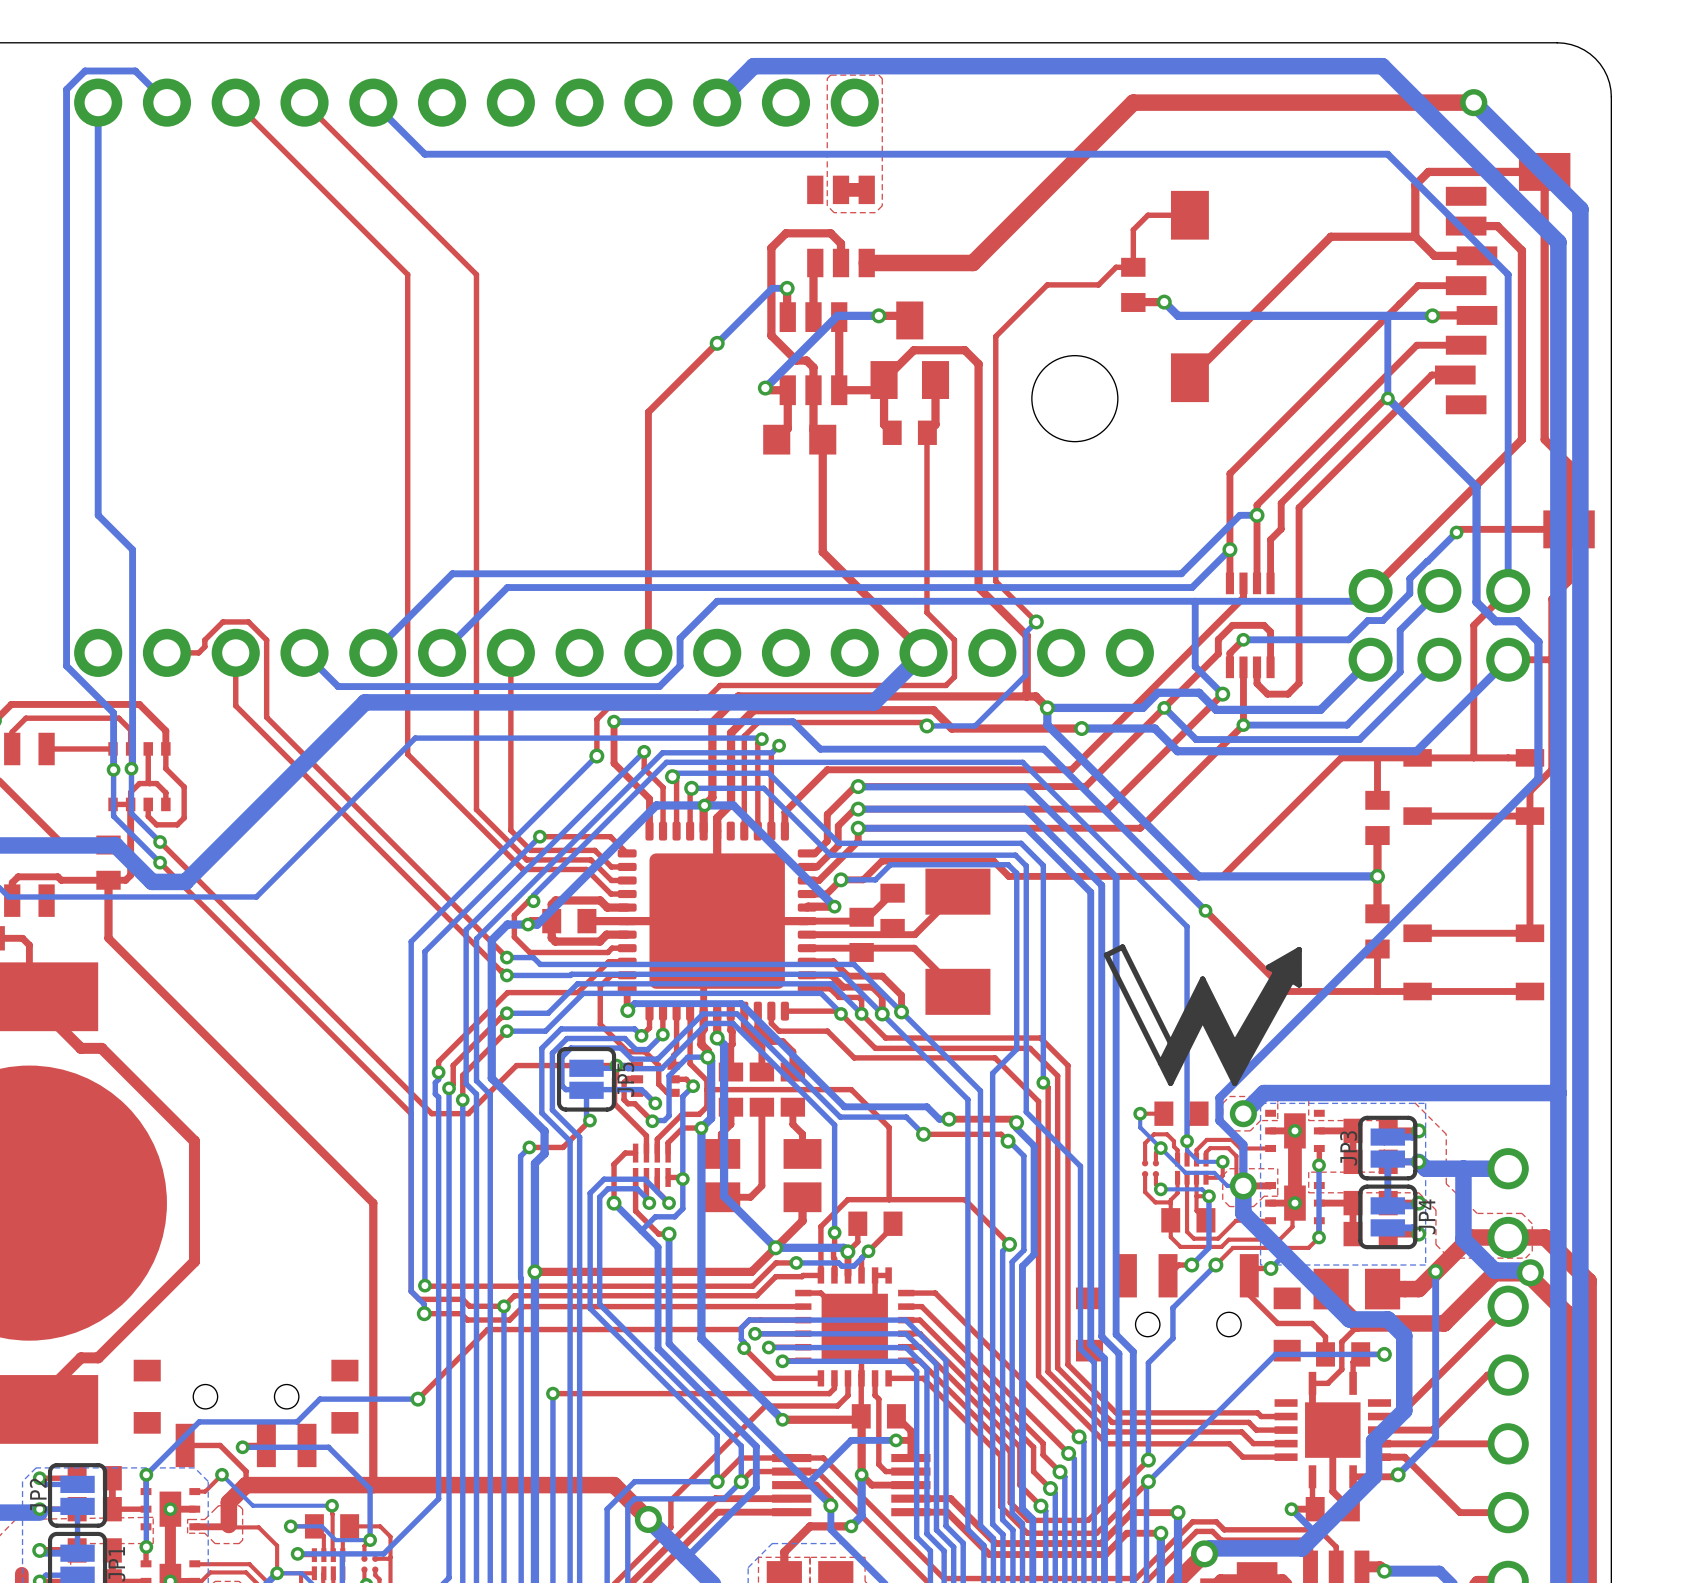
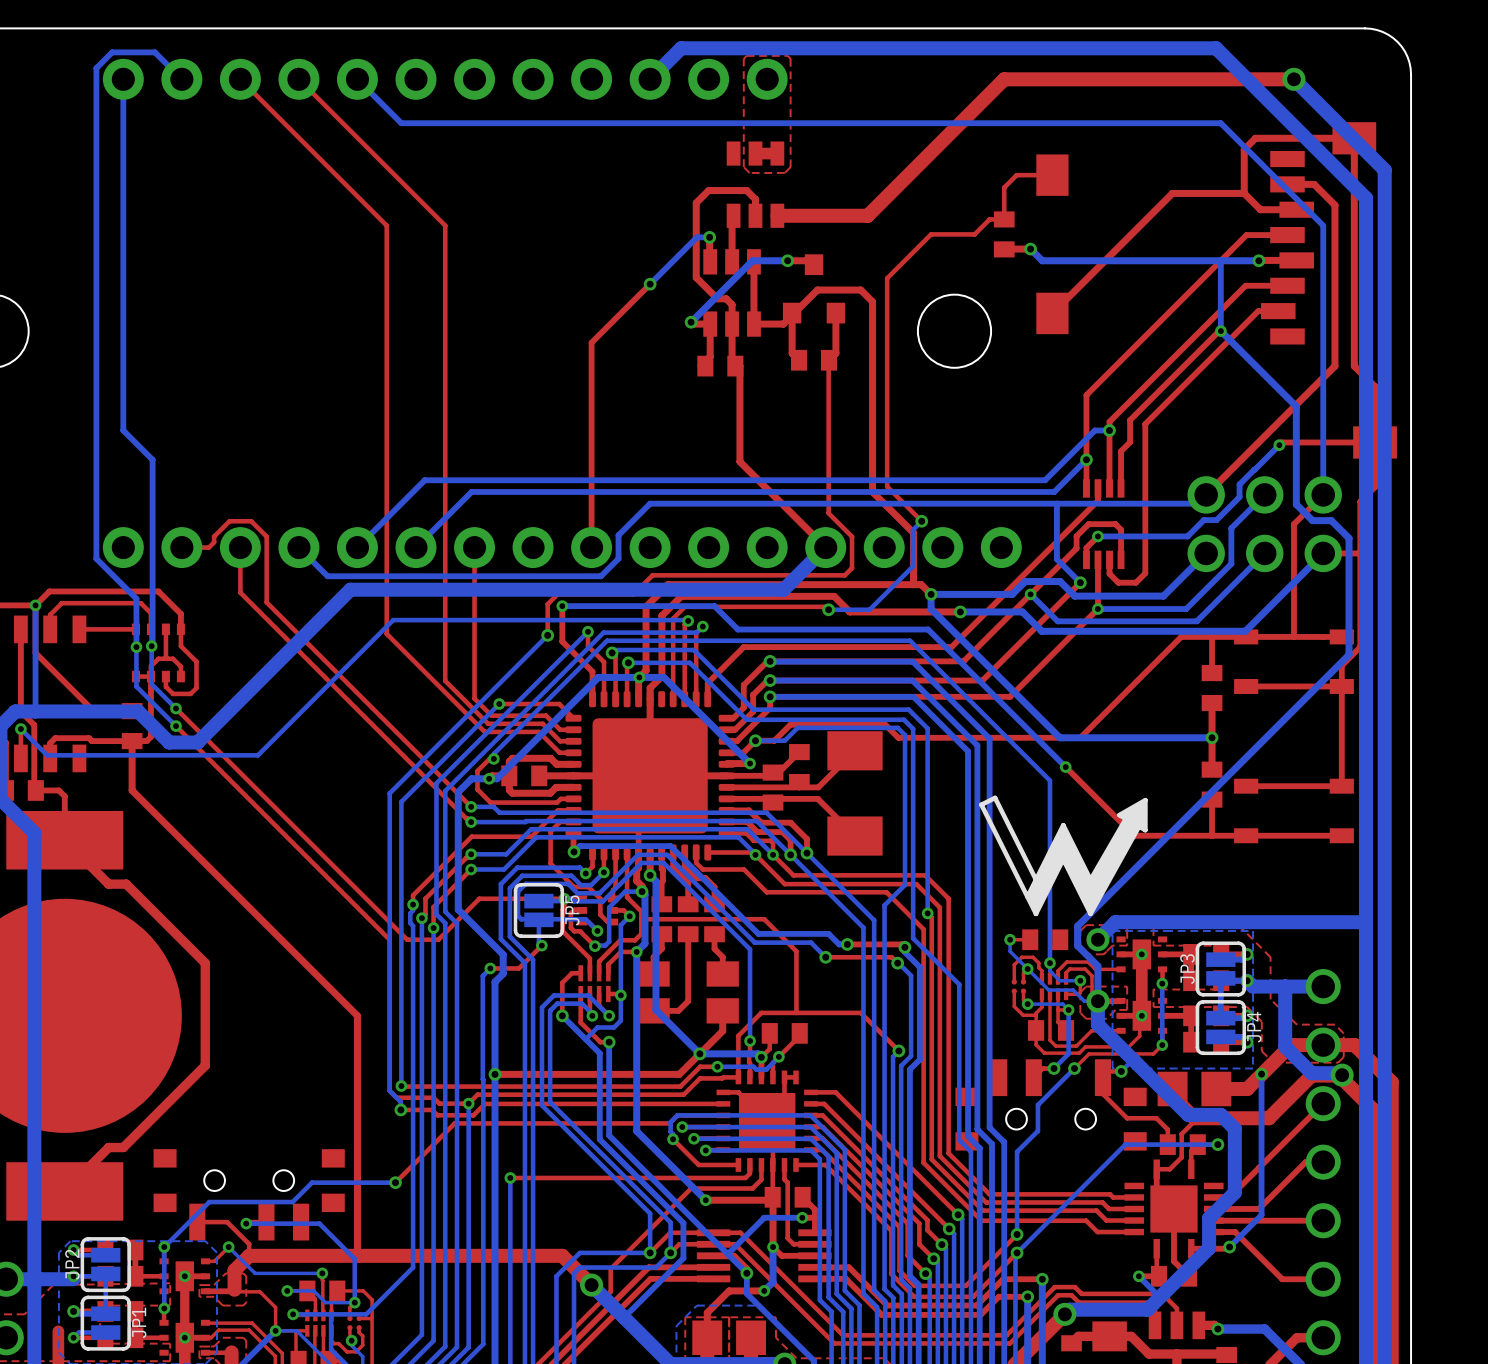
part footprint: [870, 301, 950, 399] -> [782, 254, 846, 324]
part footprint: [763, 424, 837, 455] -> [697, 355, 744, 377]

